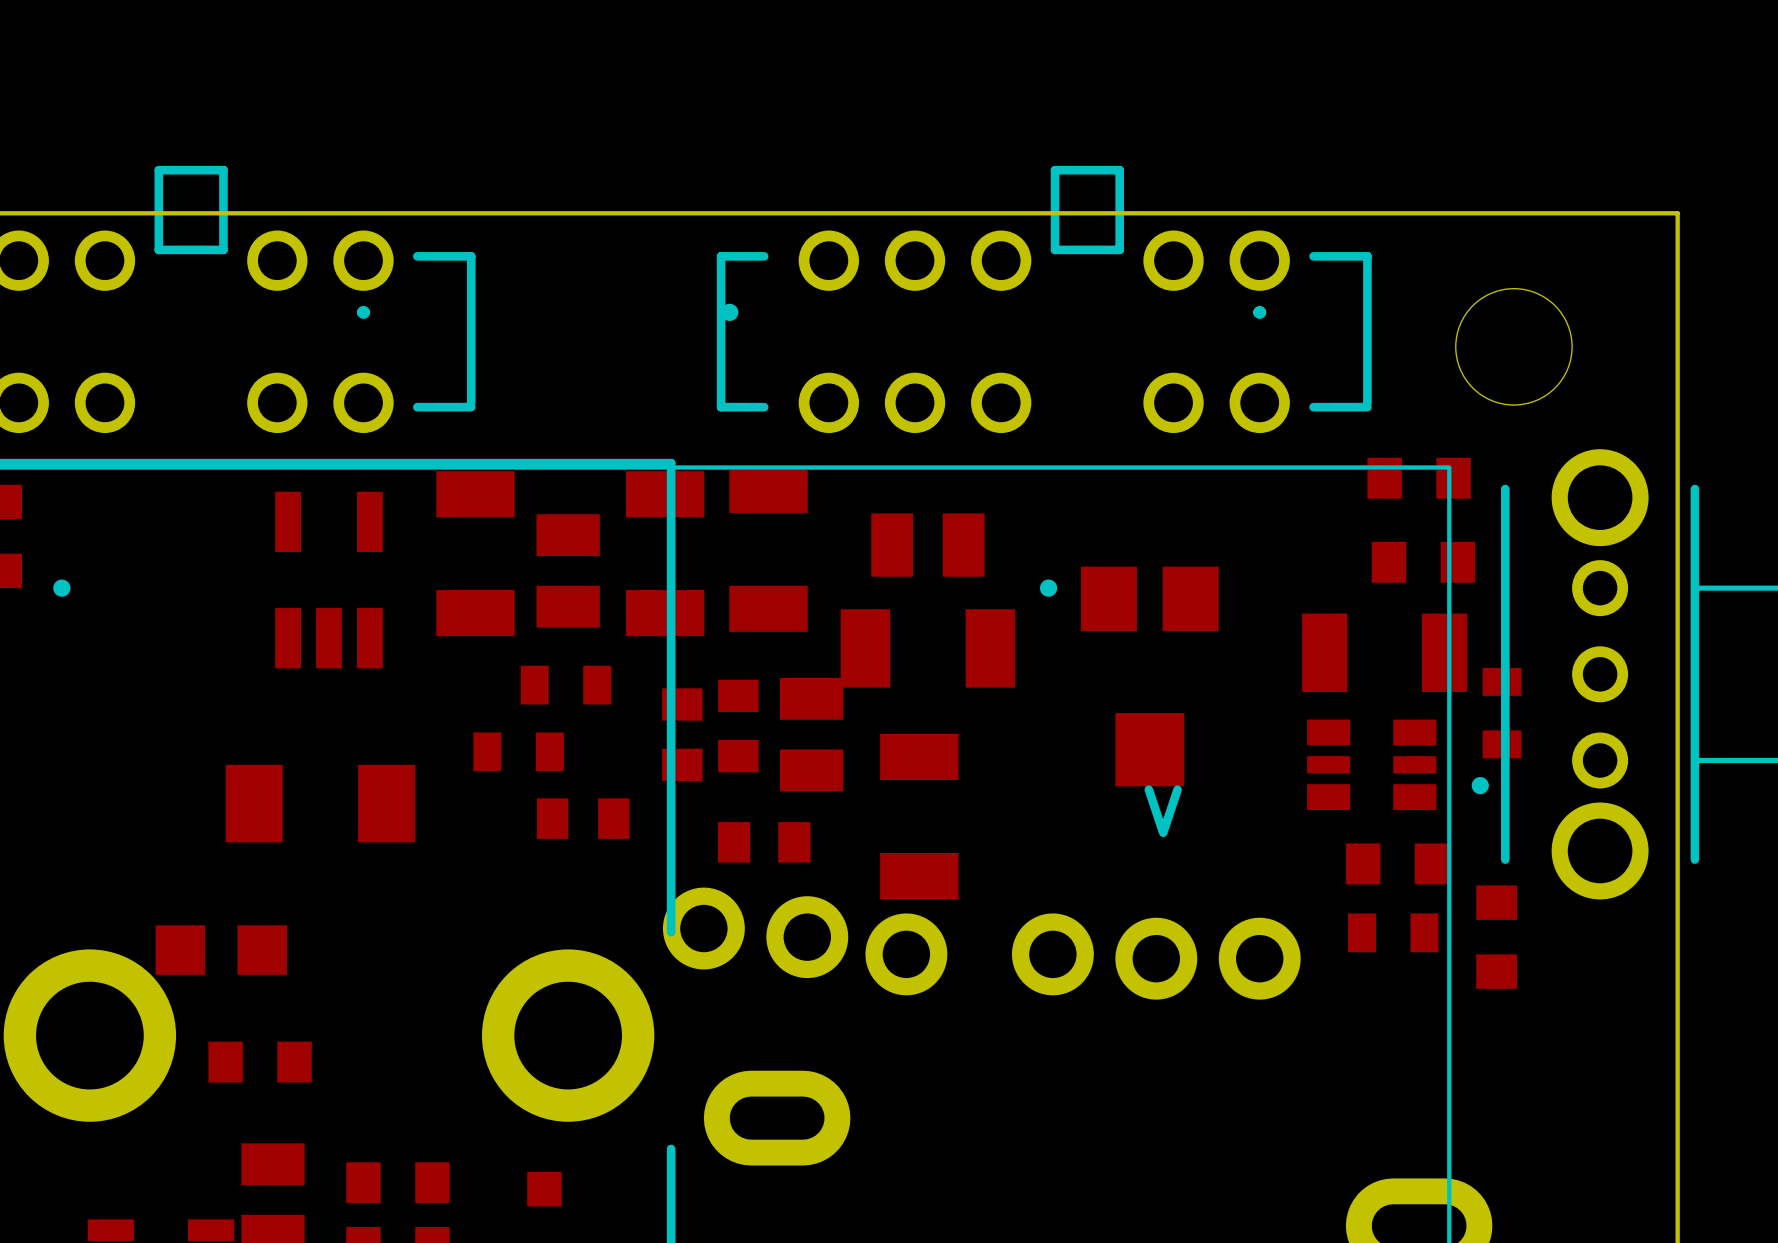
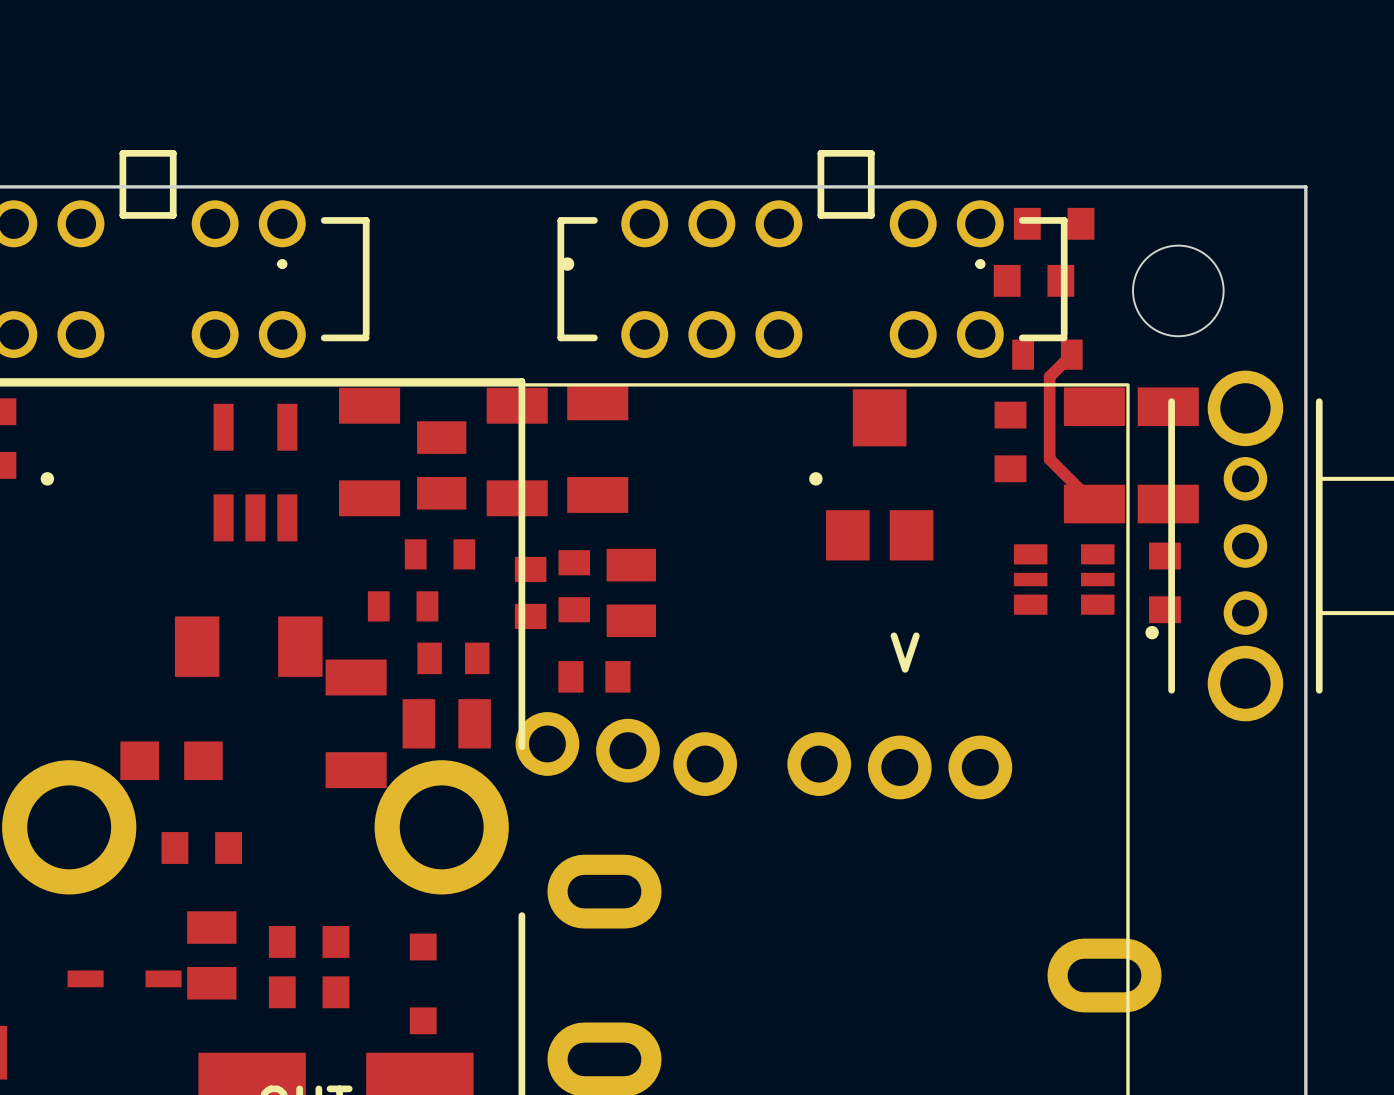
part: none -> (1054, 223)
part: none -> (1034, 280)
top track: none -> (1071, 354) (1049, 376) (1049, 459) (1094, 504)
part: (1419, 478) -> none
part: none -> (1010, 441)
part footprint: [1371, 541, 1476, 583] -> [1063, 387, 1125, 524]
part position: (927, 545) -> (446, 723)
part rotation: 0° (927, 648) -> 90° clockwise (1168, 455)
part position: (927, 648) -> (1168, 455)
part: (1384, 652) -> none
part footprint: [1482, 667, 1522, 759] -> [1148, 542, 1181, 624]
part rotation: 0° (1149, 676) -> 180° (879, 474)
part position: (1371, 764) -> (1064, 579)
part position: (919, 816) -> (356, 723)
part: (1397, 863) -> none
part position: (1393, 932) -> (1047, 354)
part: (1496, 937) -> none

